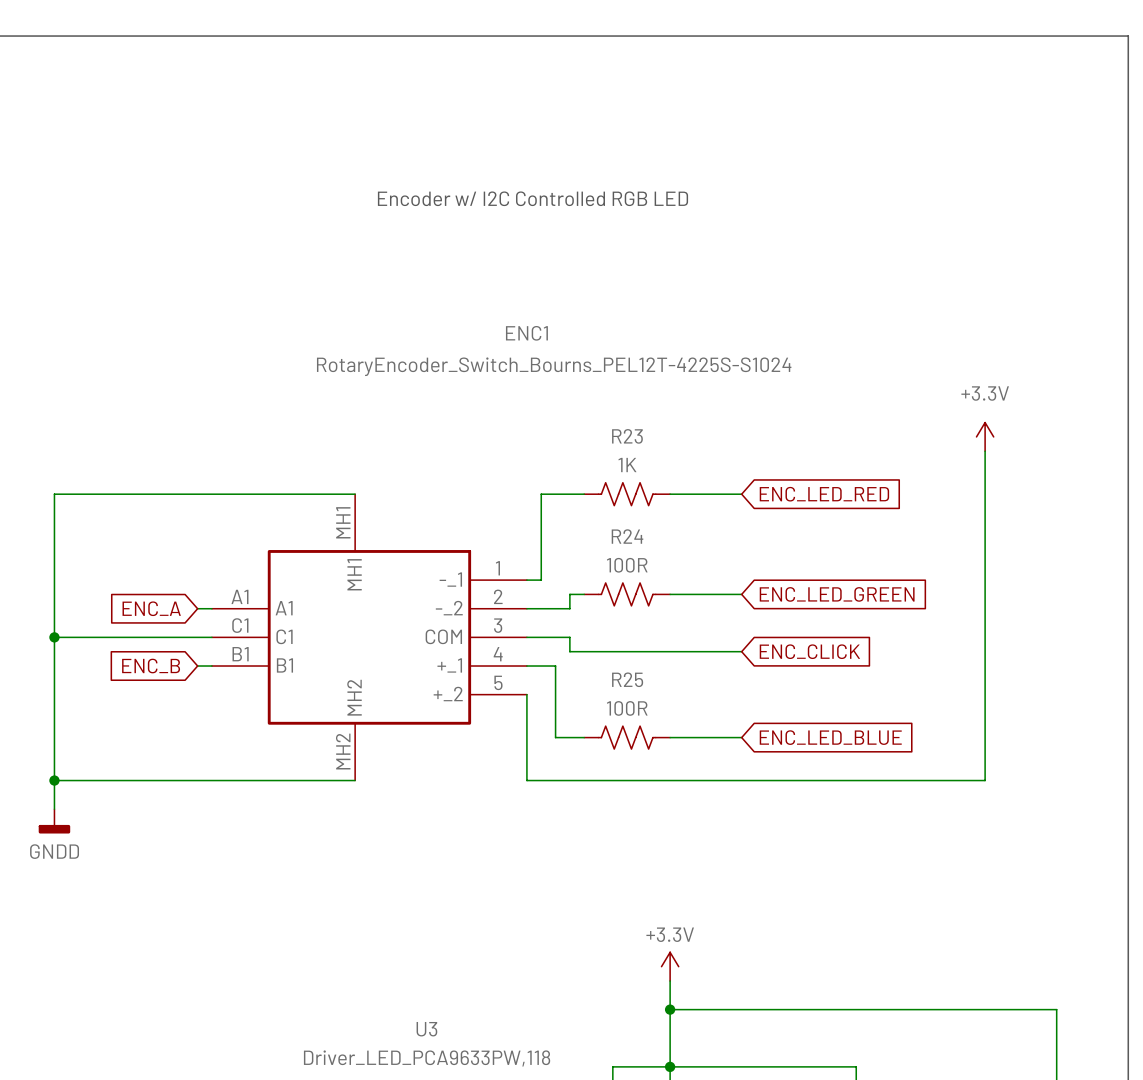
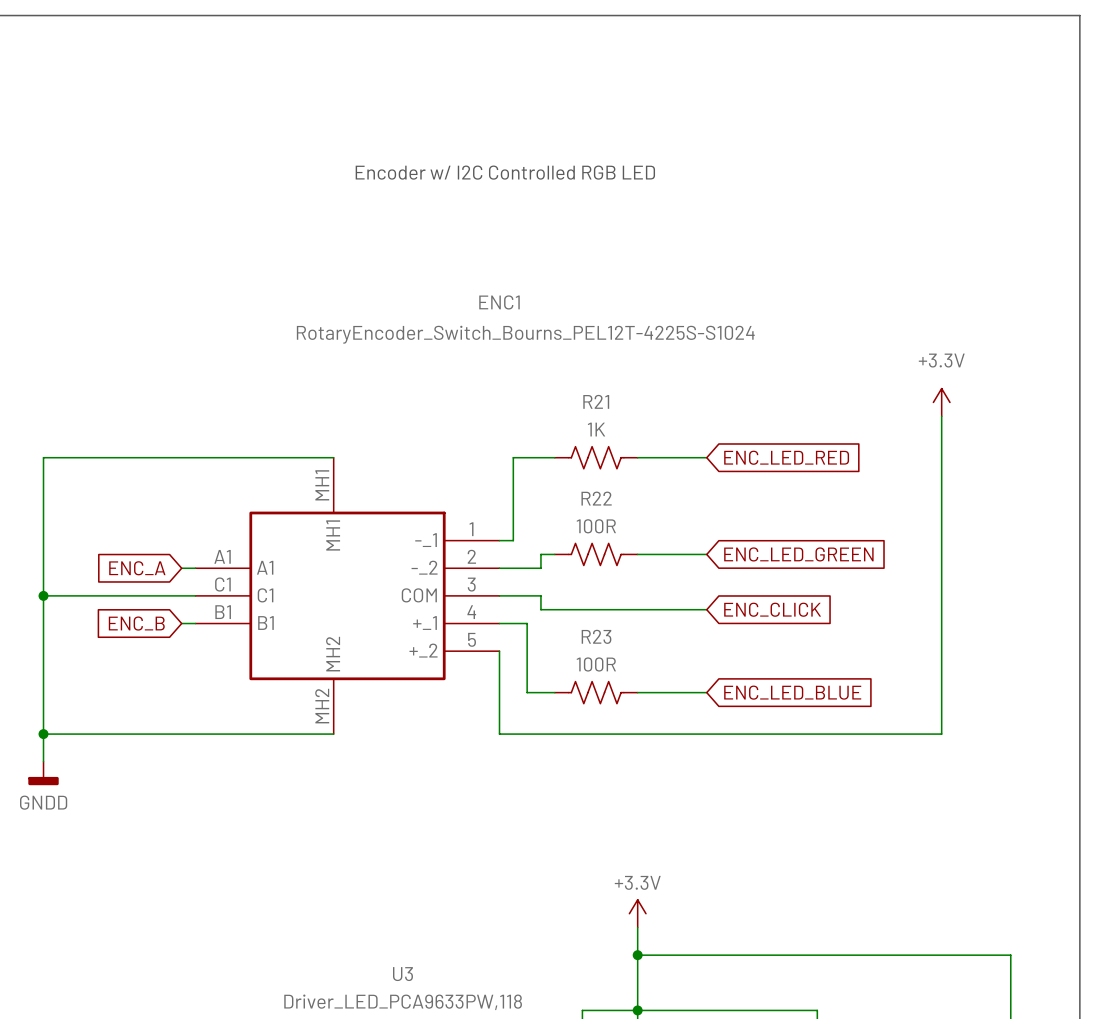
R23 name: R23 (627, 436) -> R21 (596, 401)
R24 name: R24 (627, 536) -> R22 (596, 498)
R25 name: R25 (627, 679) -> R23 (596, 636)

